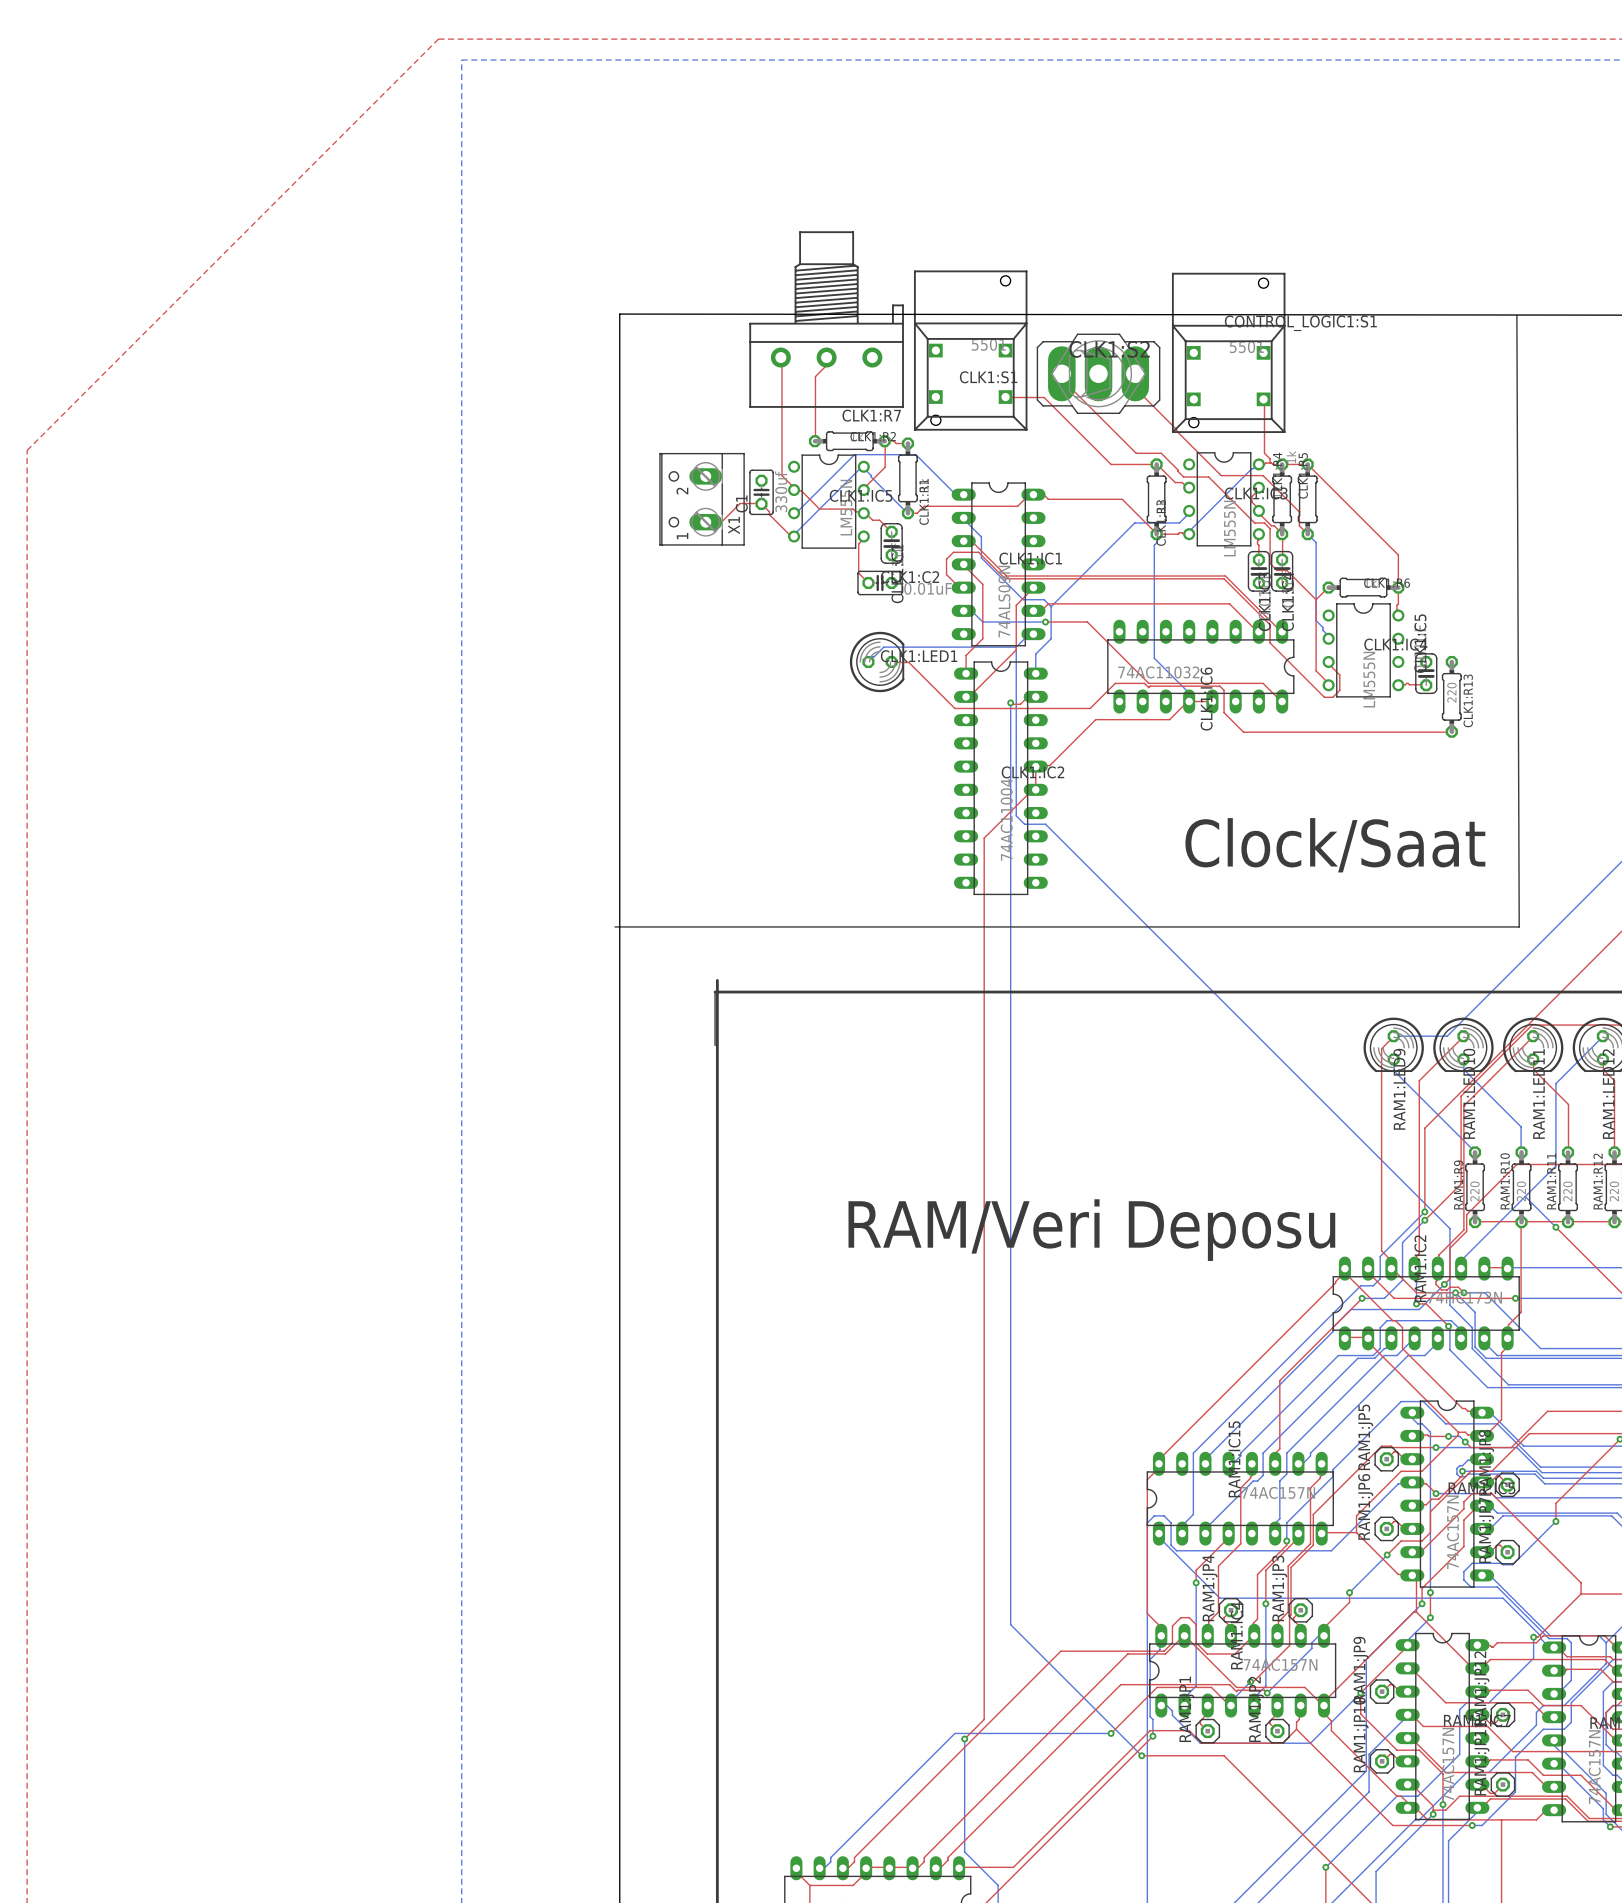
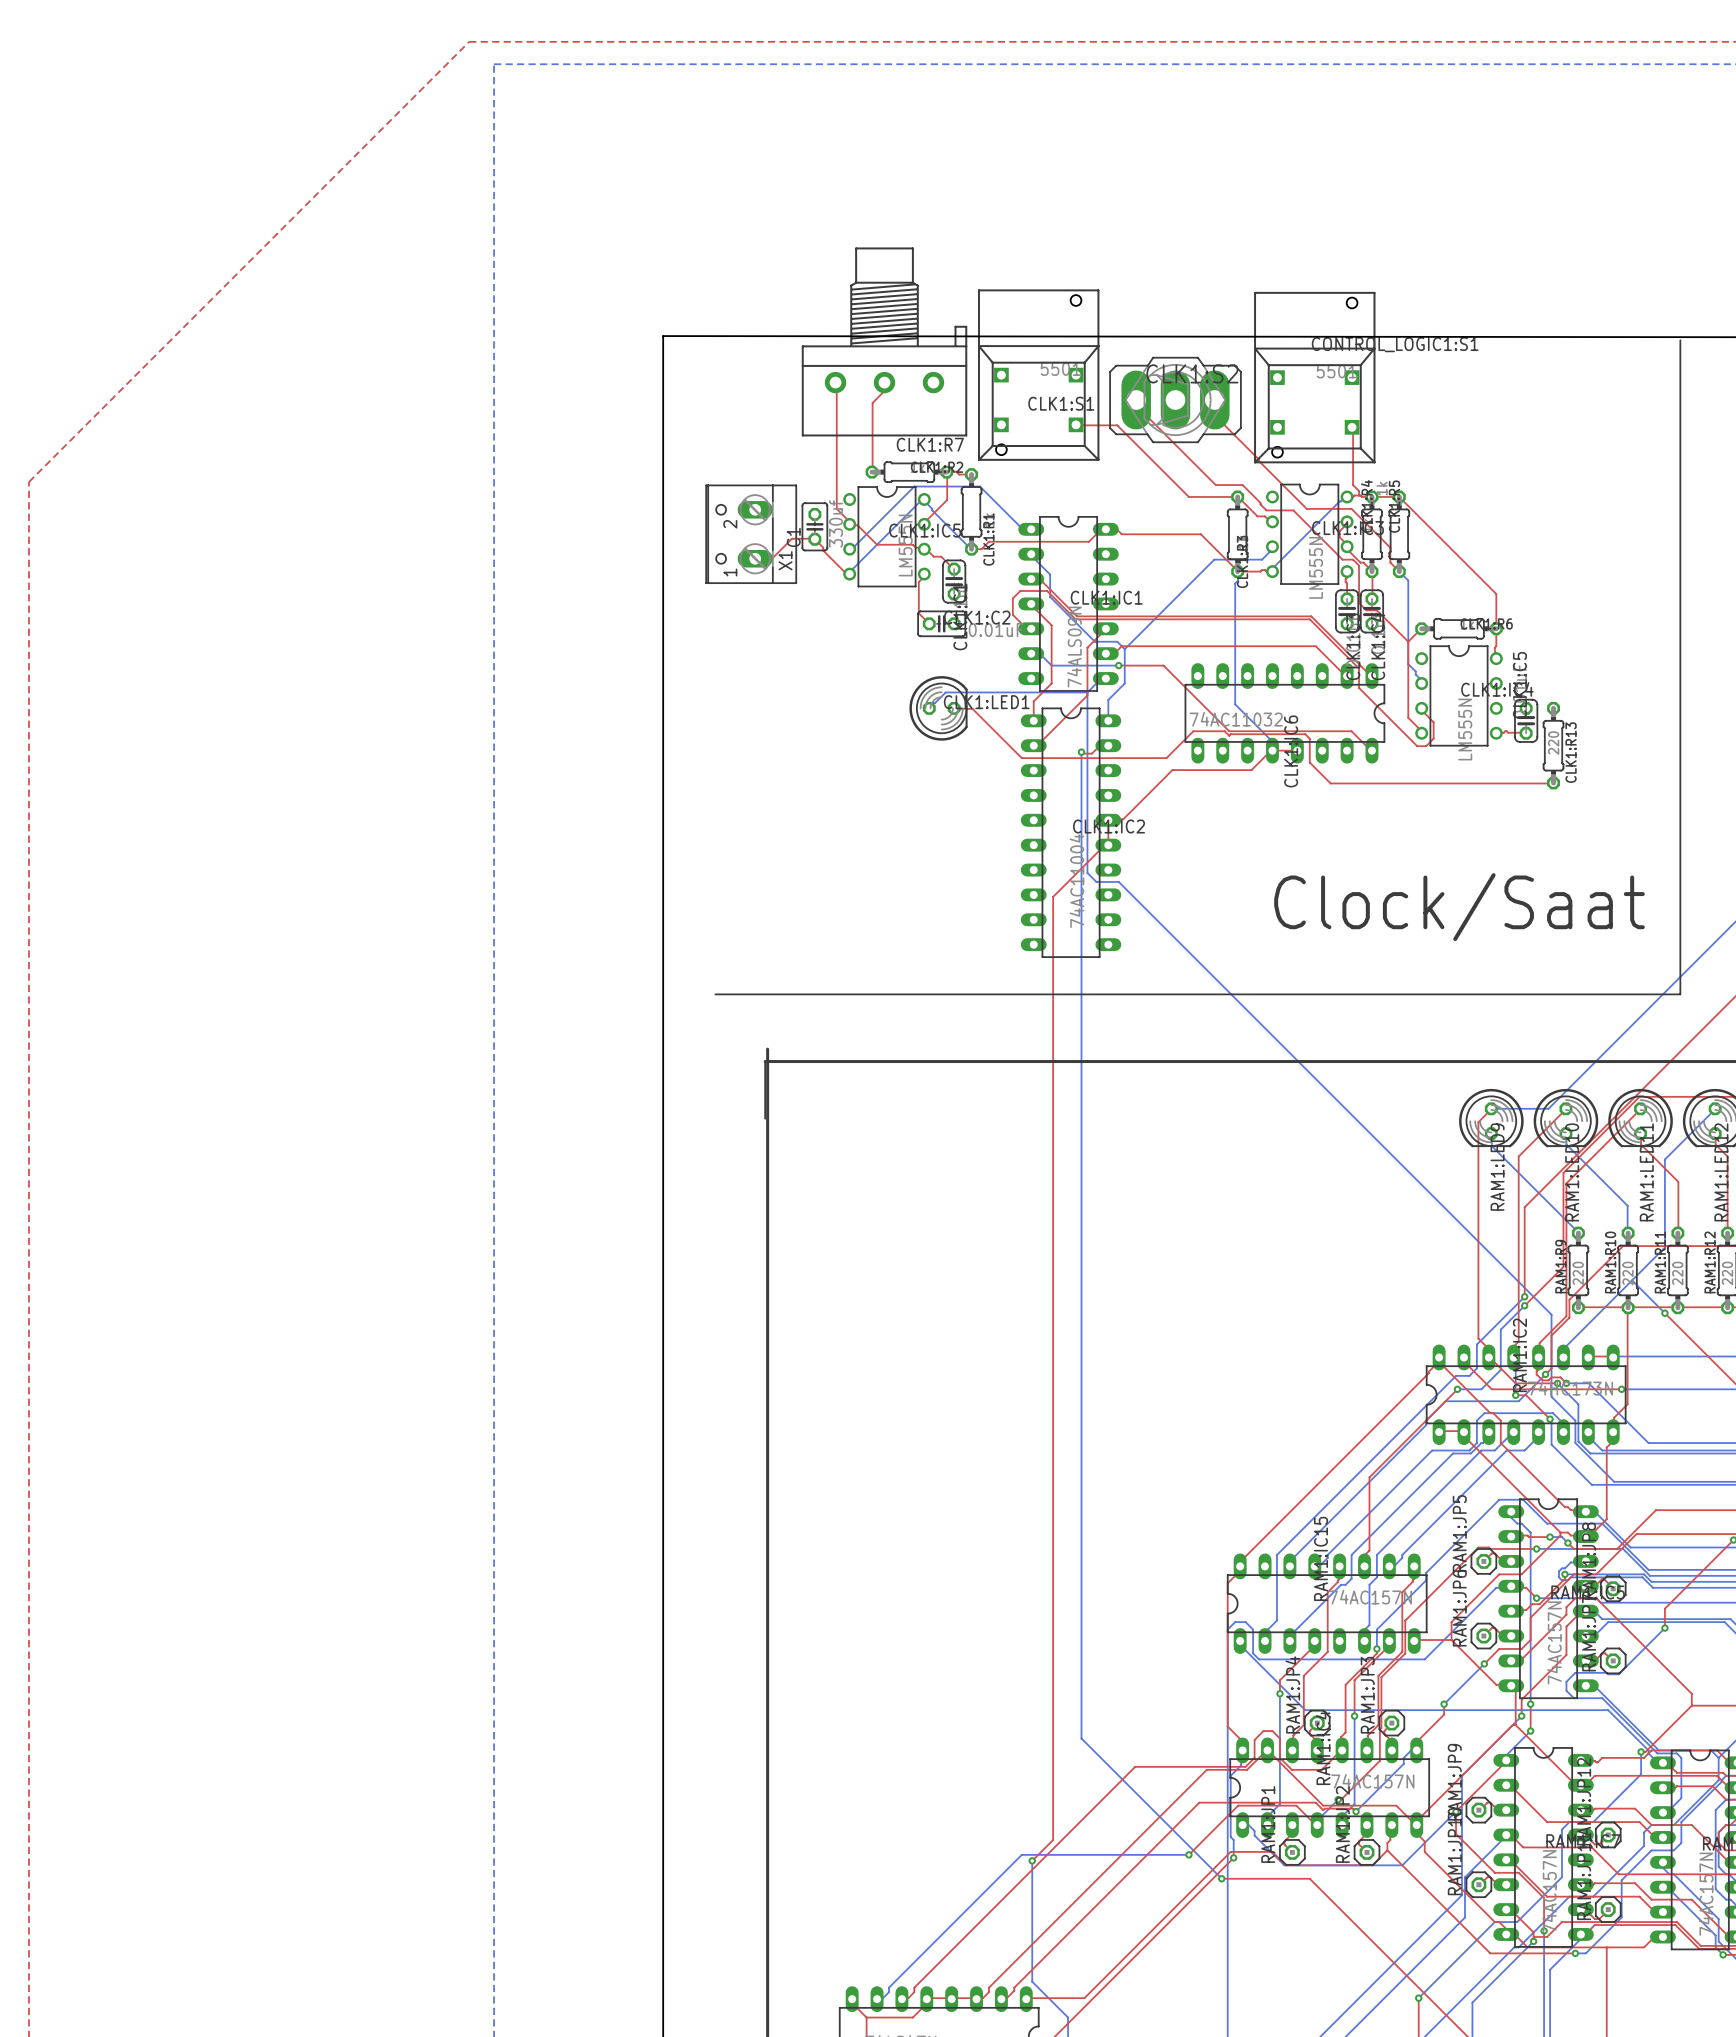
line: (1516, 315) (1519, 926) (615, 926) -> none
line: none -> (1680, 340) (1680, 994) (715, 994)
text: RAM/Veri Deposu (1091, 1230) -> none

